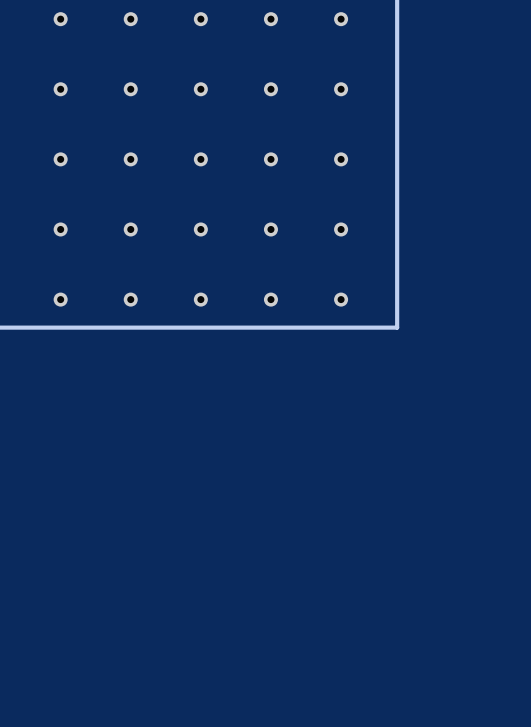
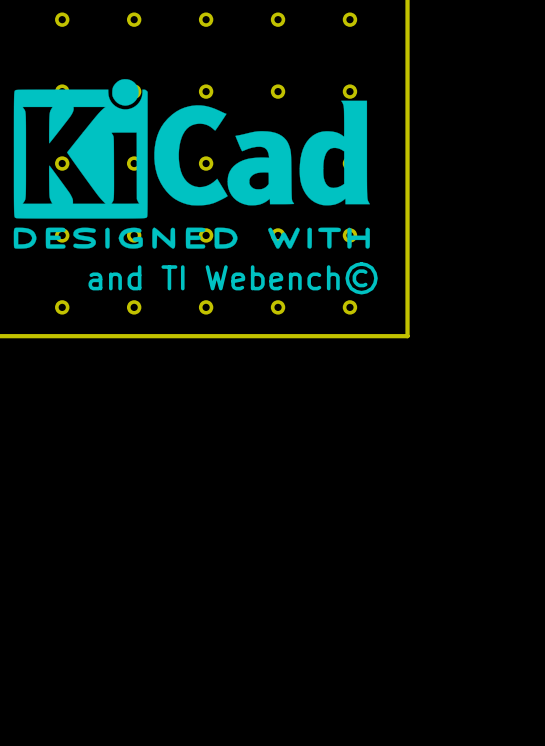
drawing: none -> [13, 79, 370, 249]
text: none -> and TI Webench© (233, 278)

